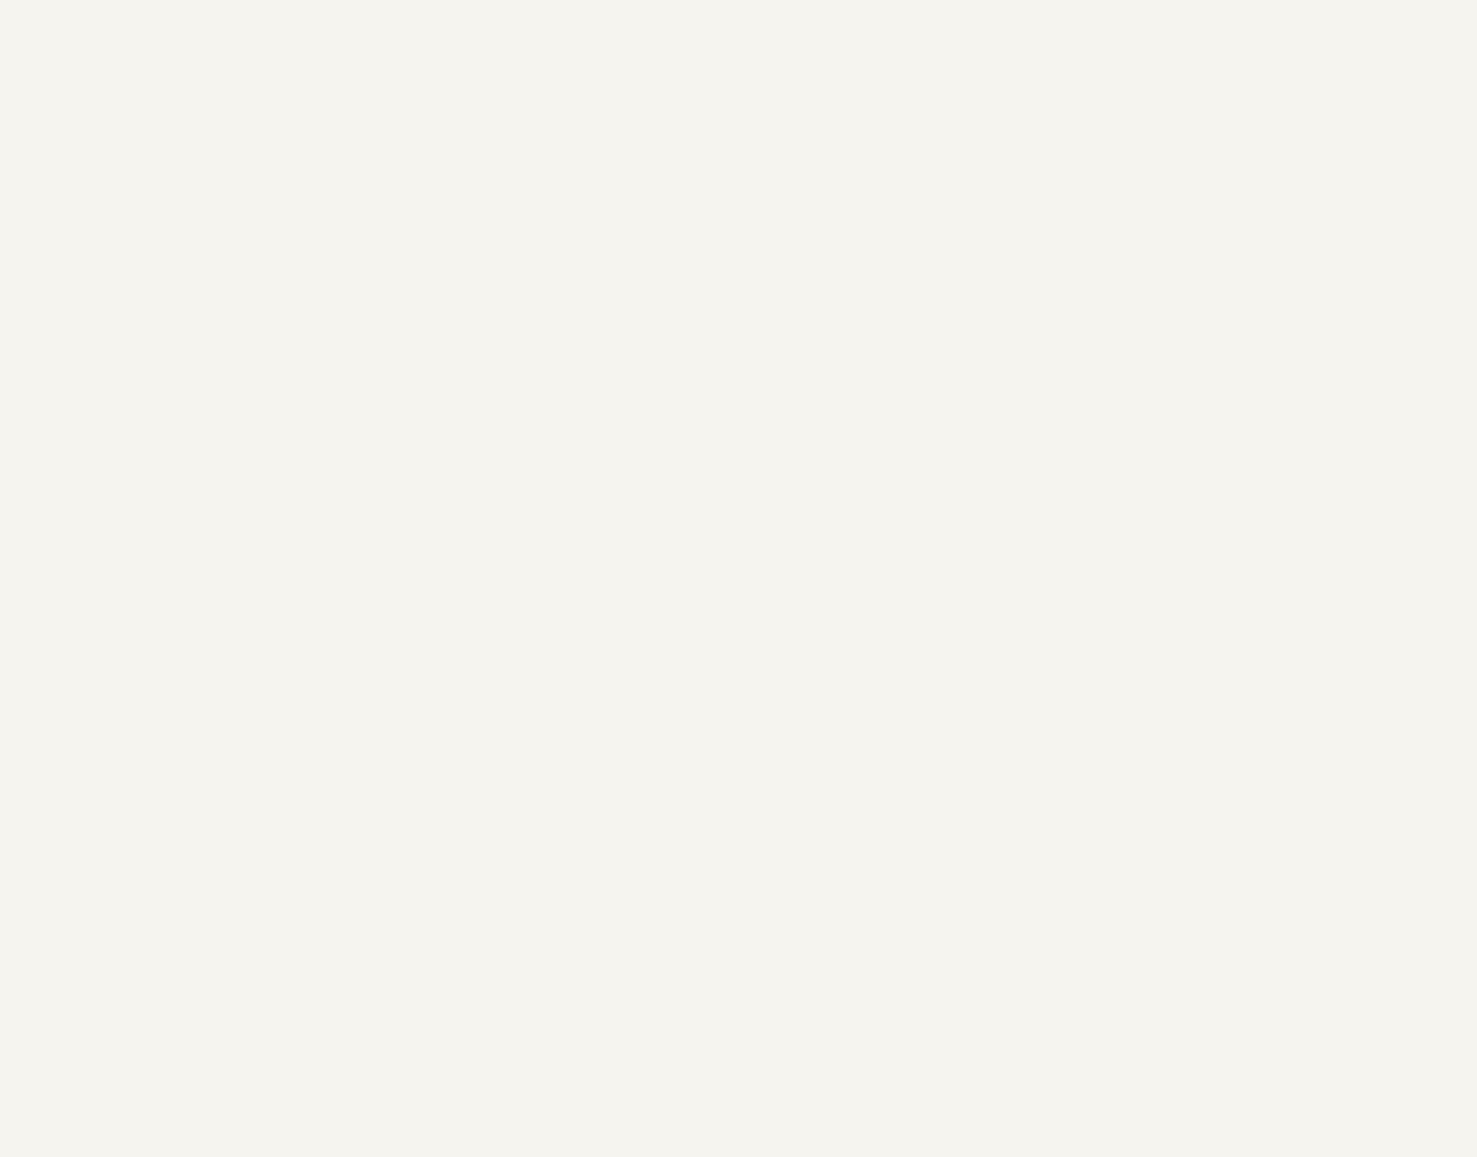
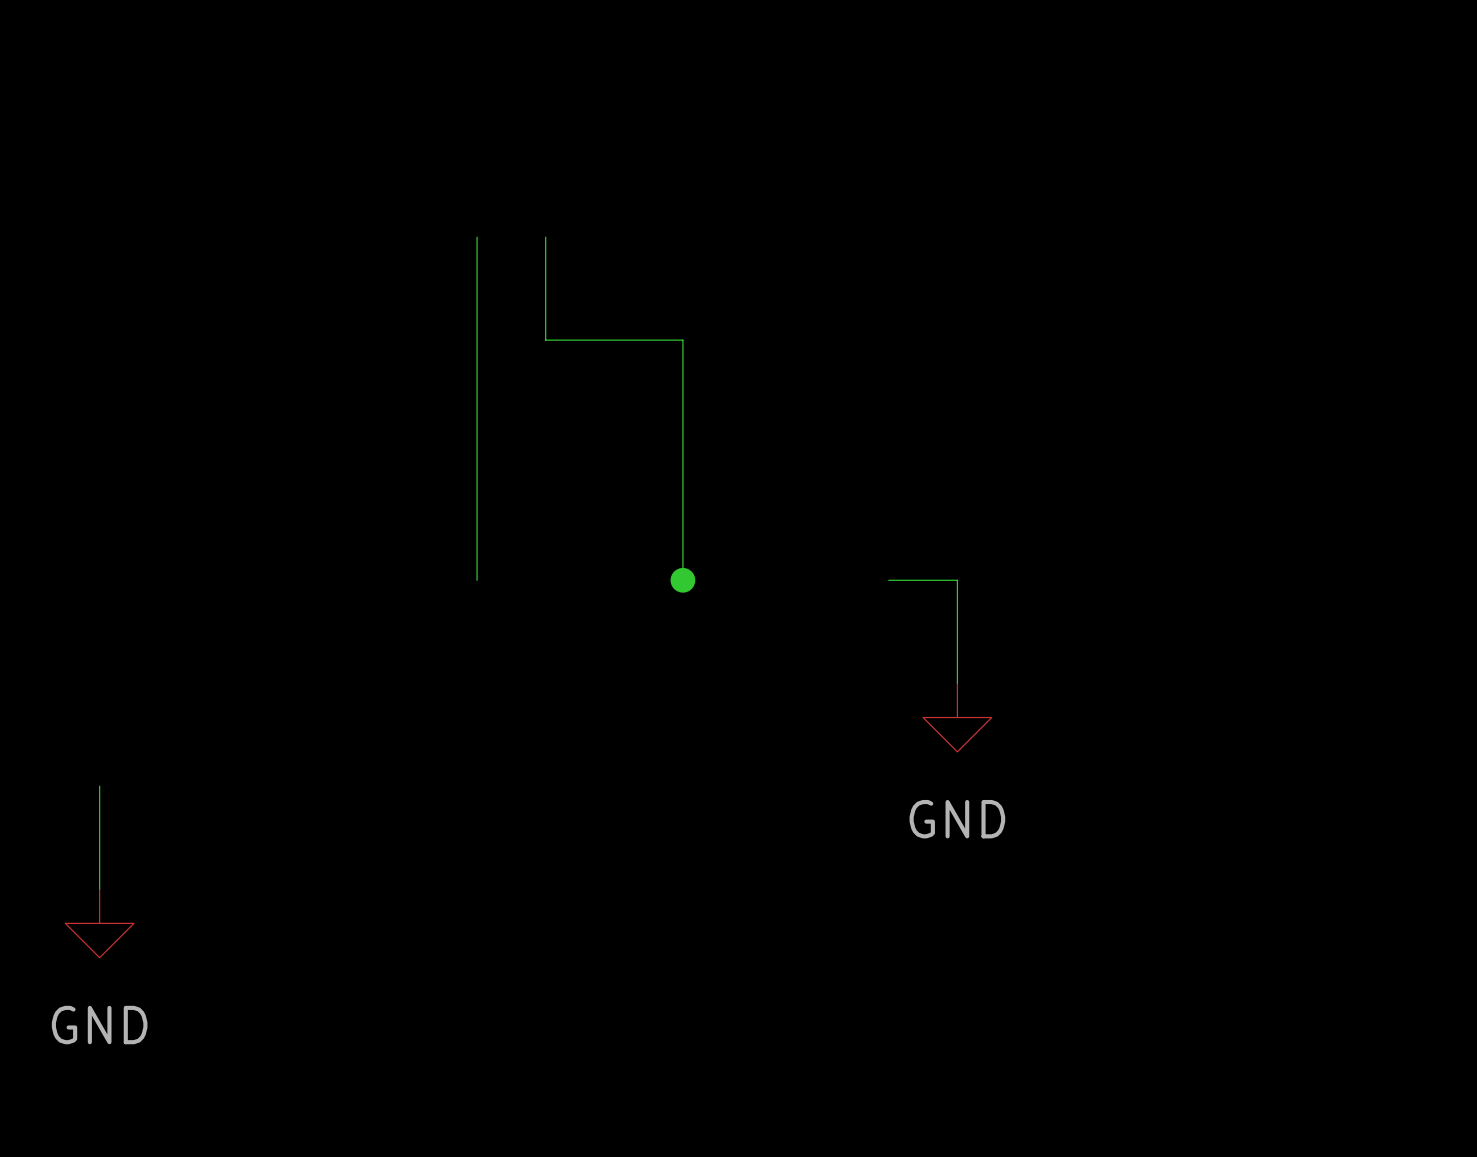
wire: none -> (477, 237) (477, 580)
wire: none -> (545, 237) (545, 340) (682, 340) (682, 580)
junction: none -> (682, 580)
wire: none -> (888, 580) (957, 580) (957, 683)
power symbol: none -> GND (957, 717)
wire: none -> (99, 786) (99, 889)
power symbol: none -> GND (99, 923)

